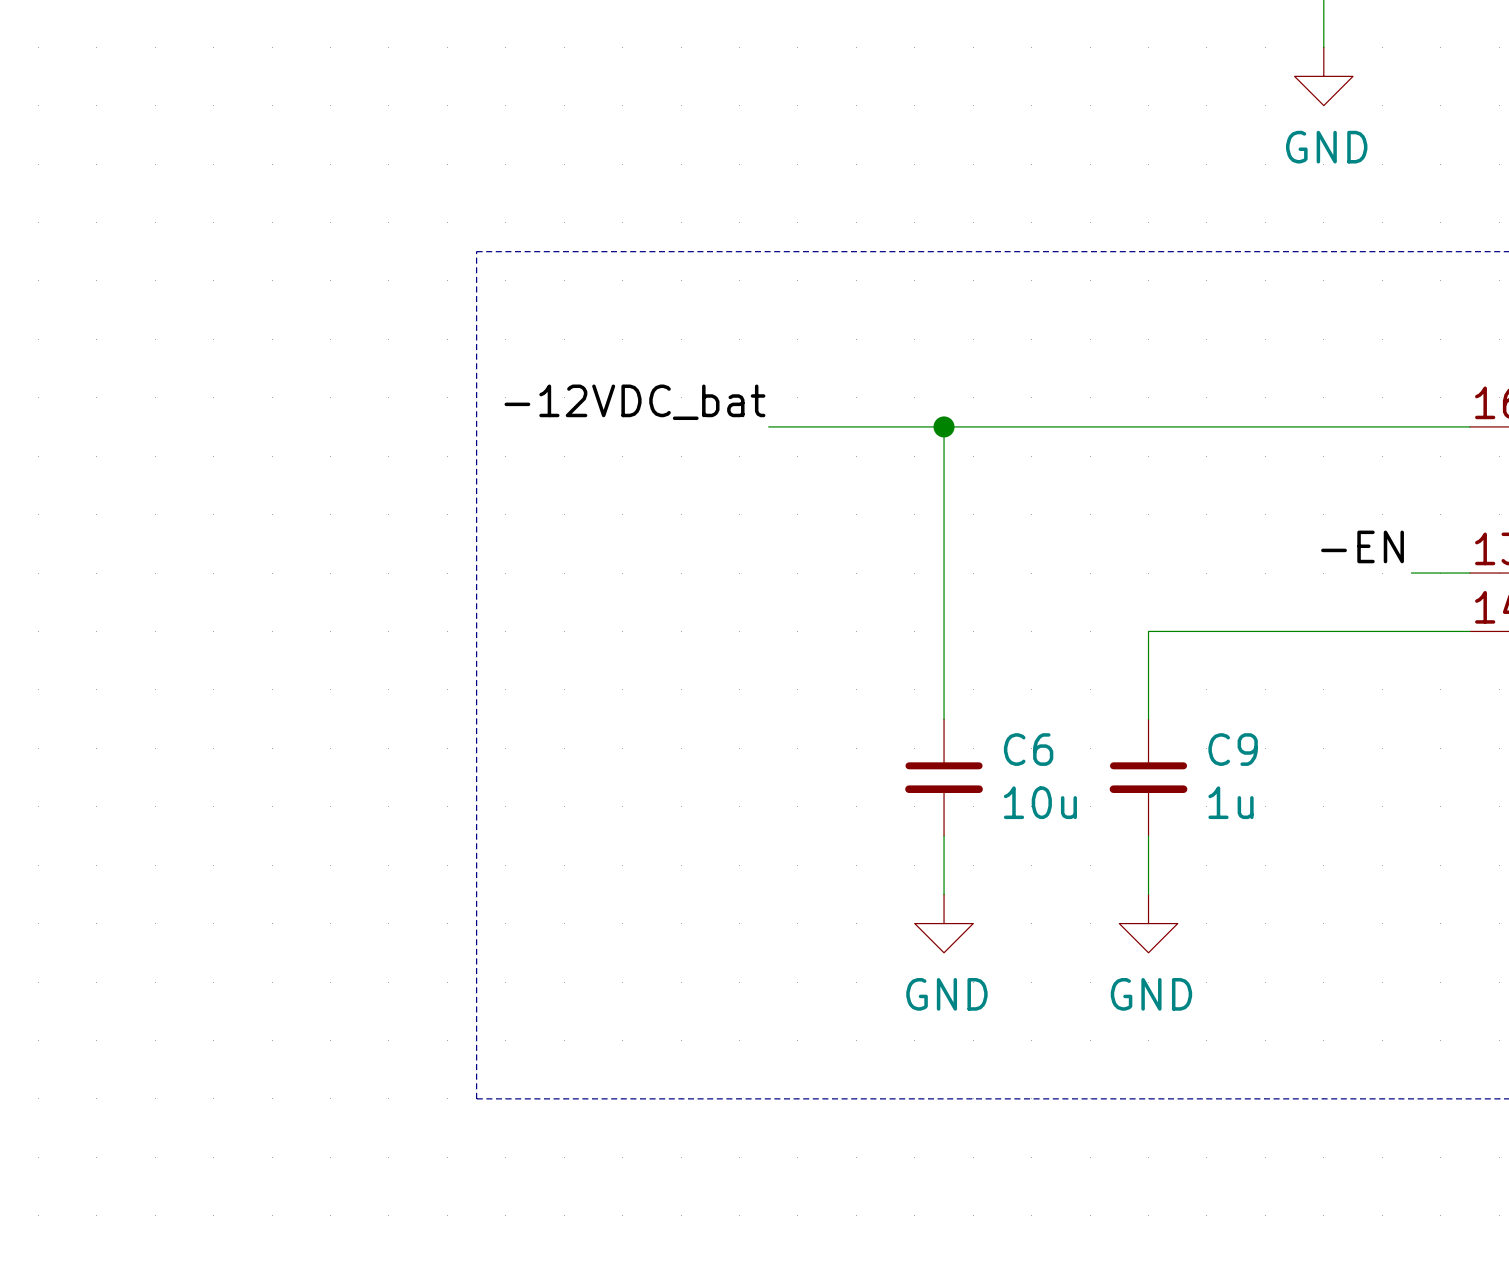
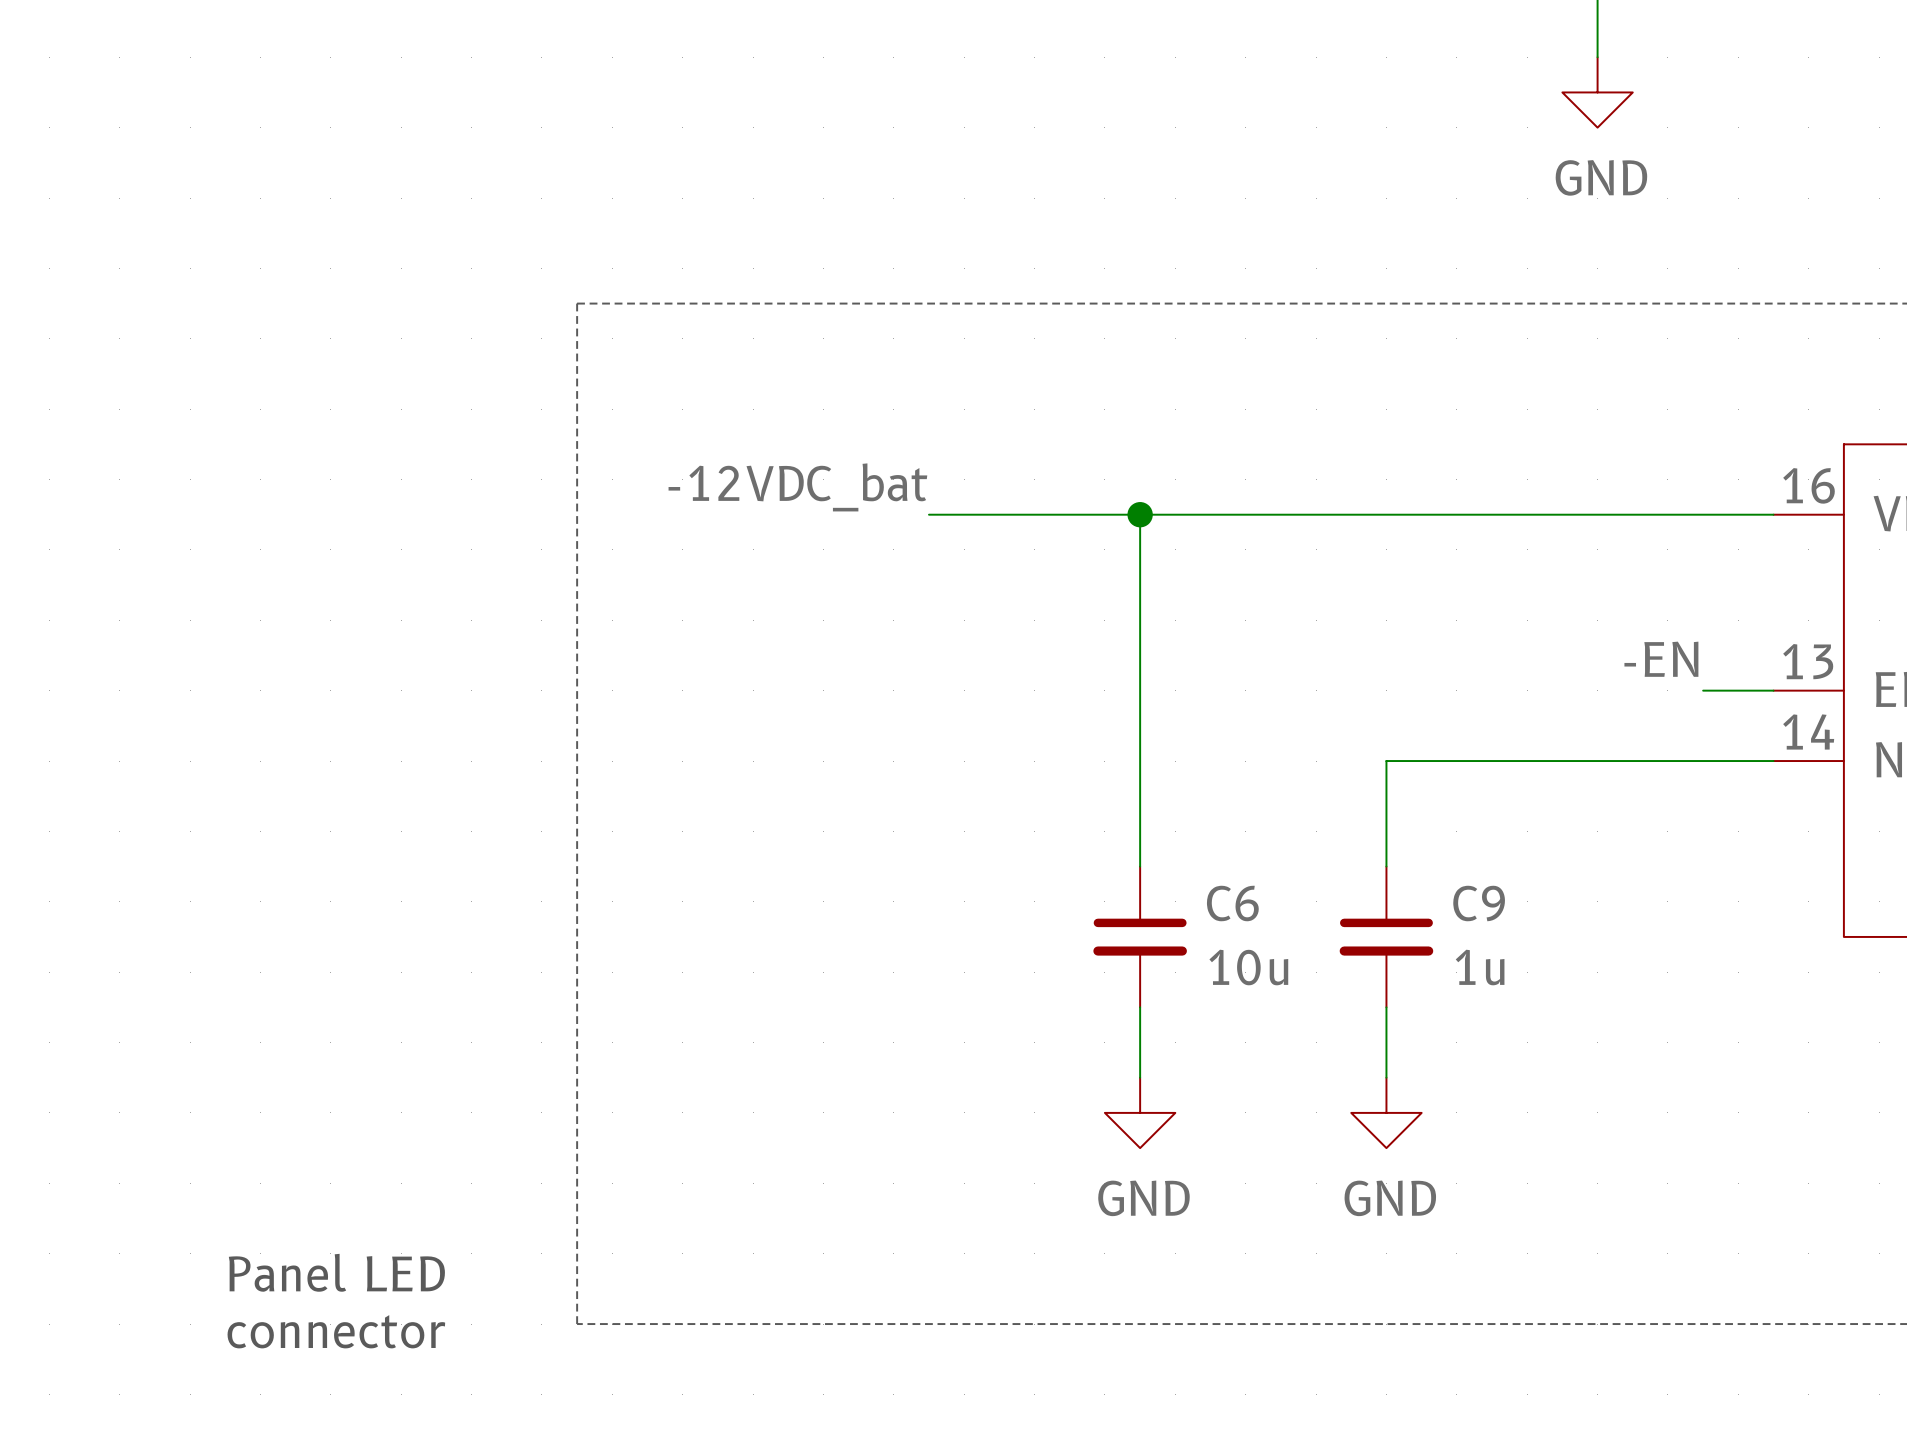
text: none -> Panel LED (336, 1272)
text: none -> connector (336, 1331)

